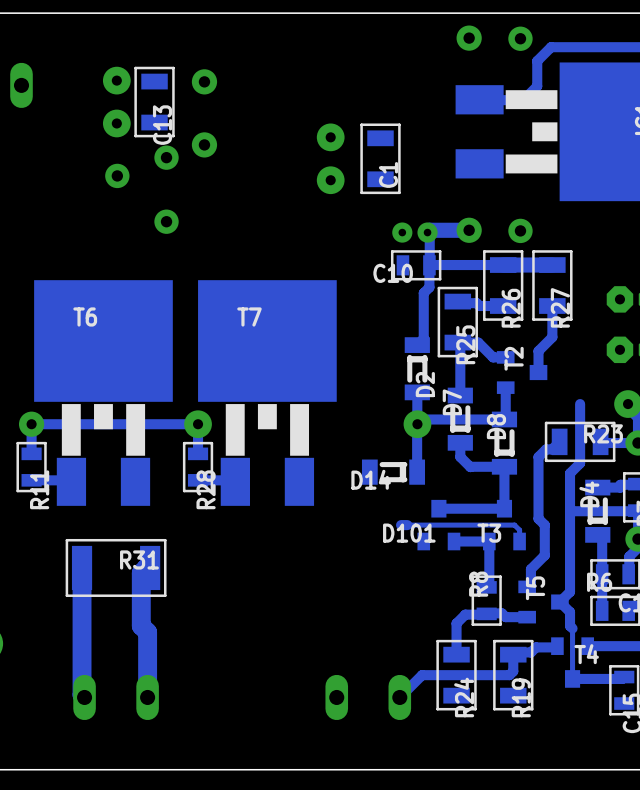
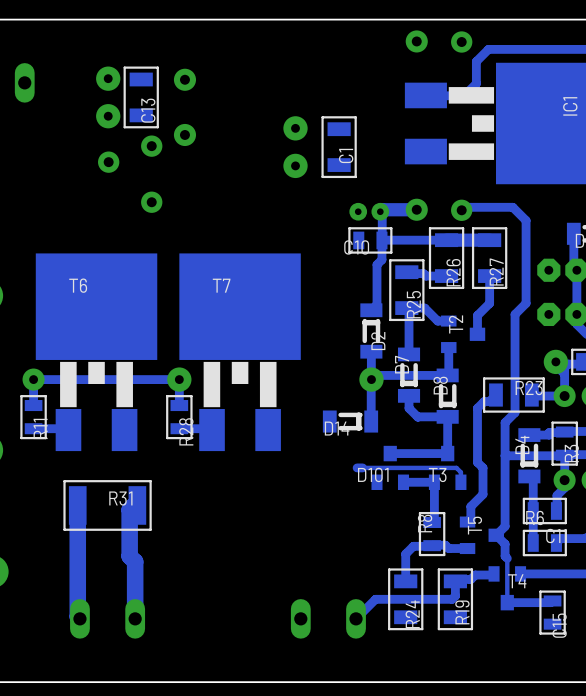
track: (580, 404) (580, 463) -> (461, 210) (464, 207) (512, 207) (526, 220) (526, 303) (515, 314) (513, 413)

